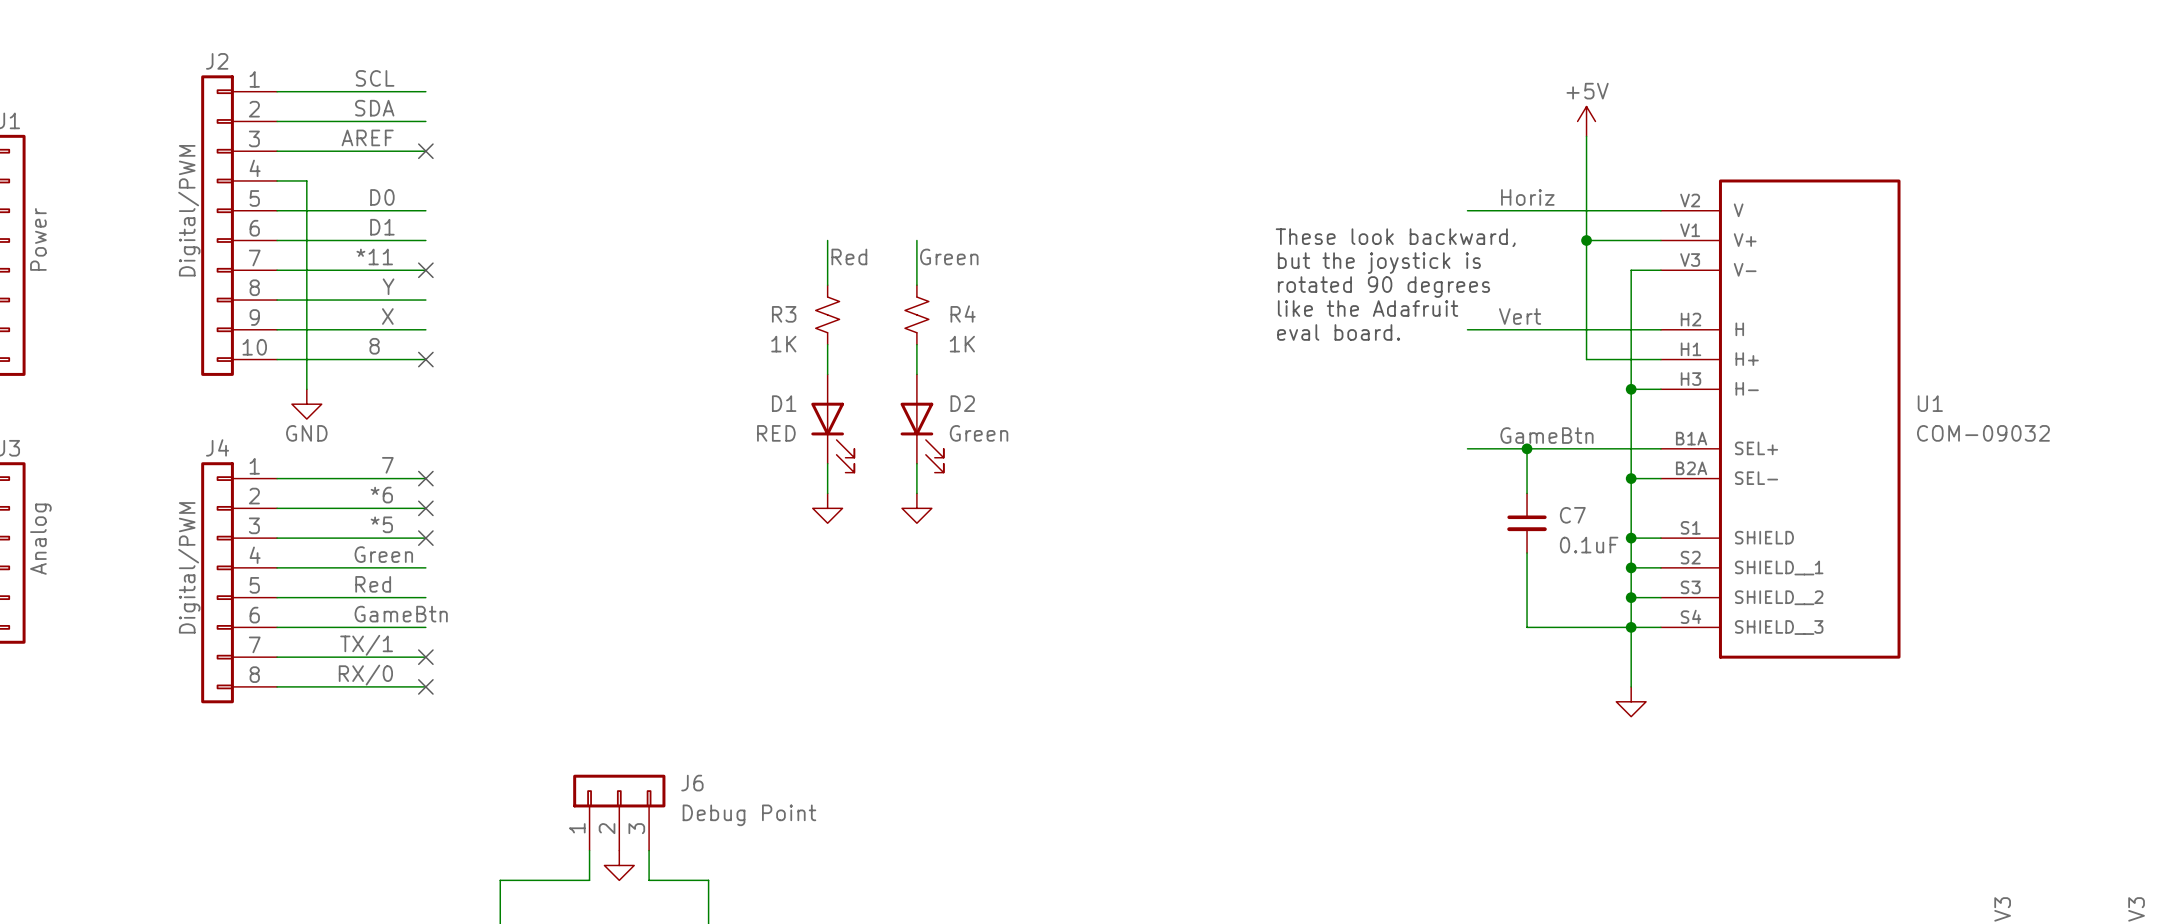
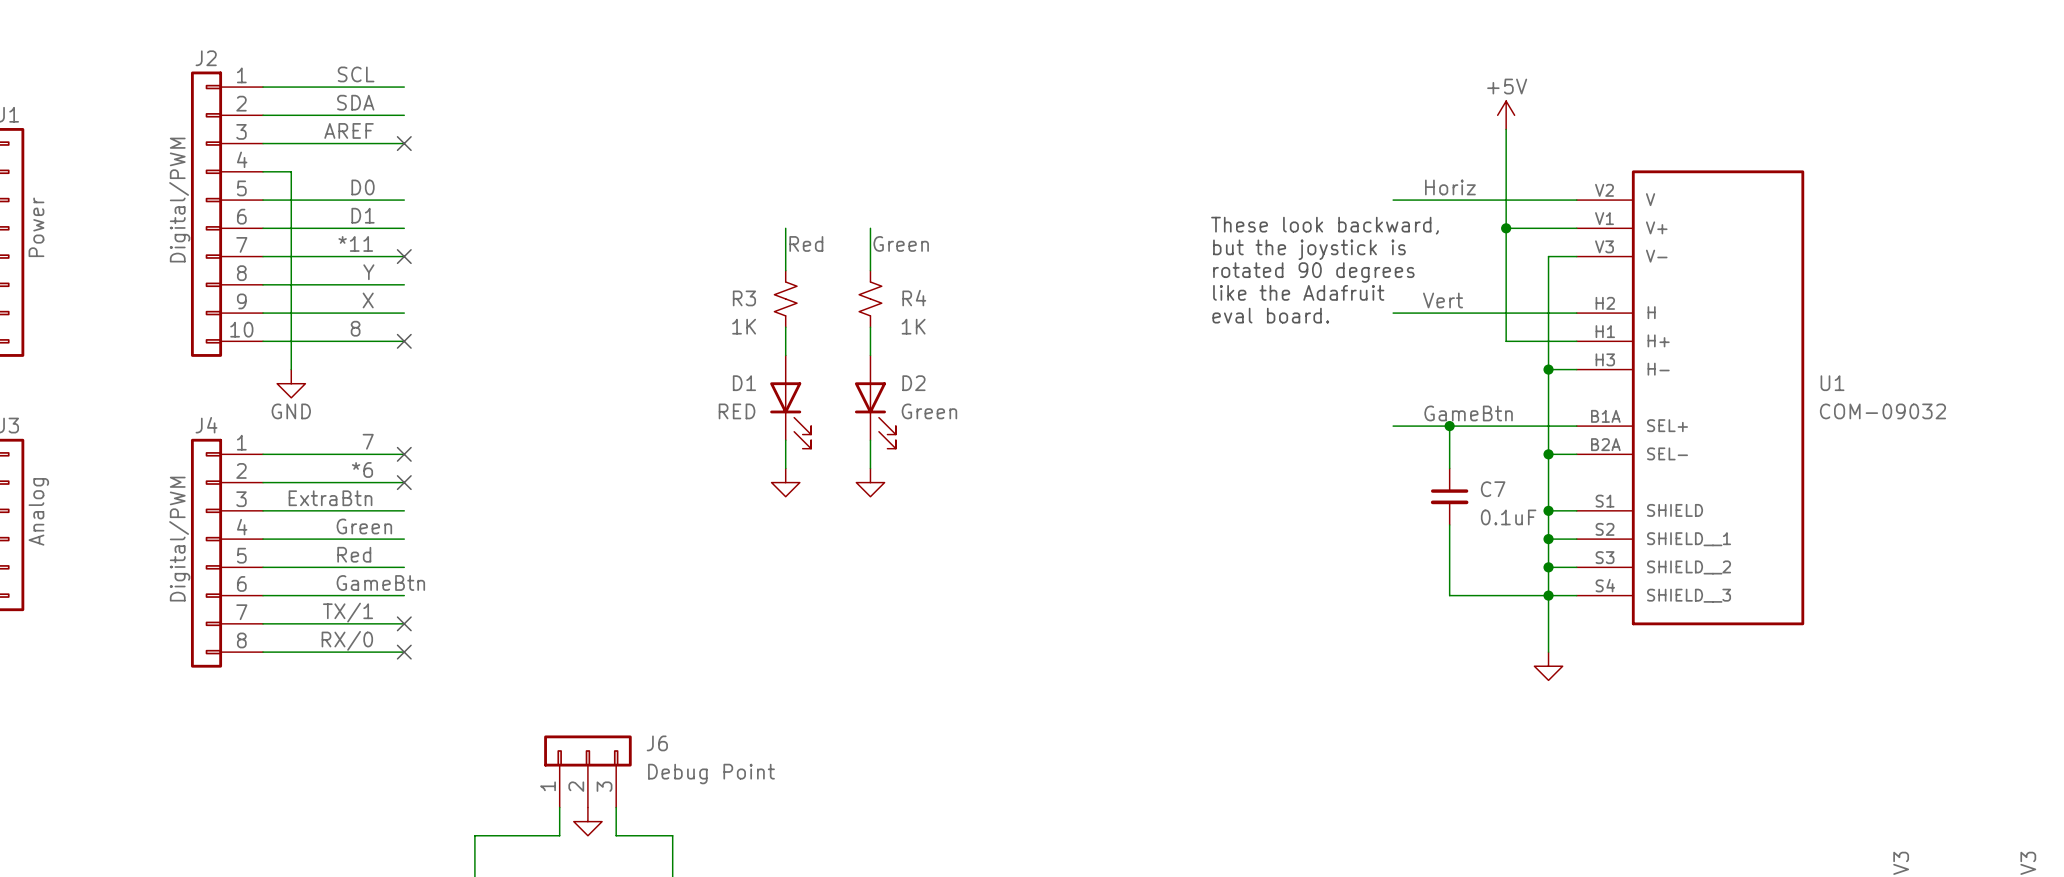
label: *5 (381, 524) -> ExtraBtn (330, 498)
no-connect mark: (425, 538) -> none

